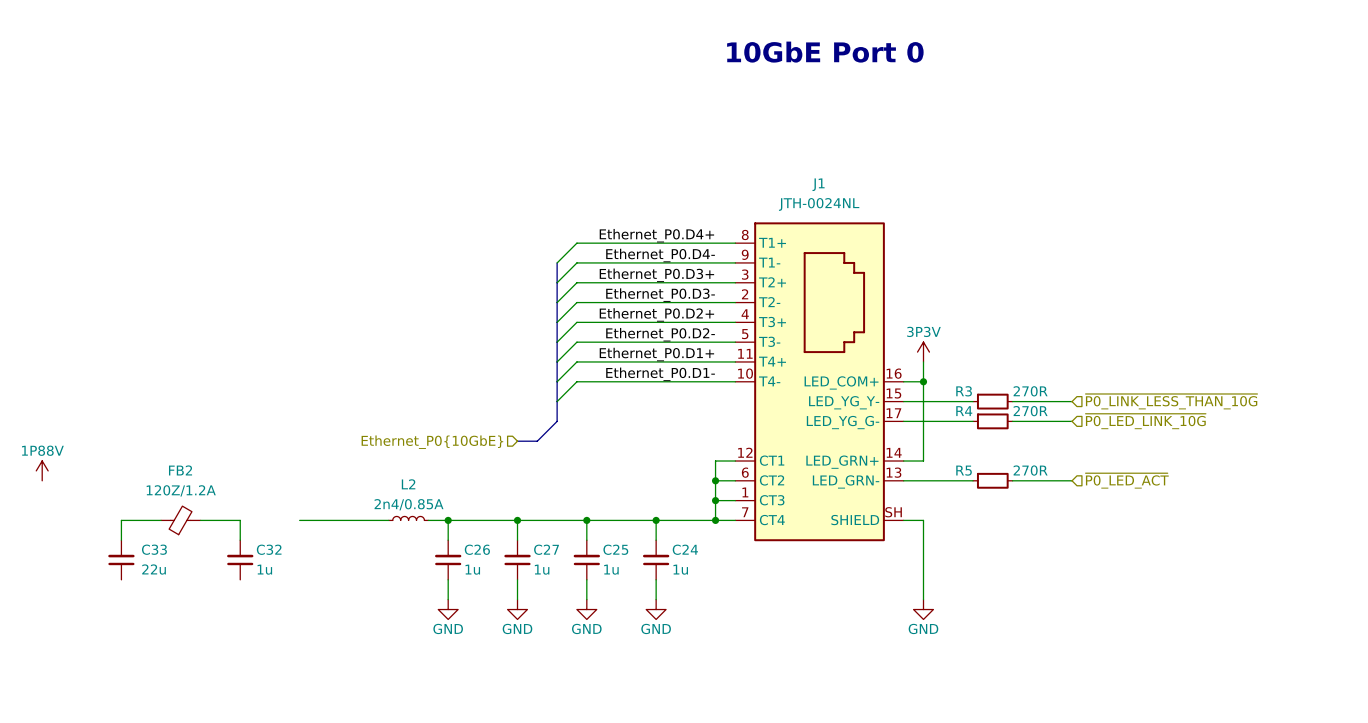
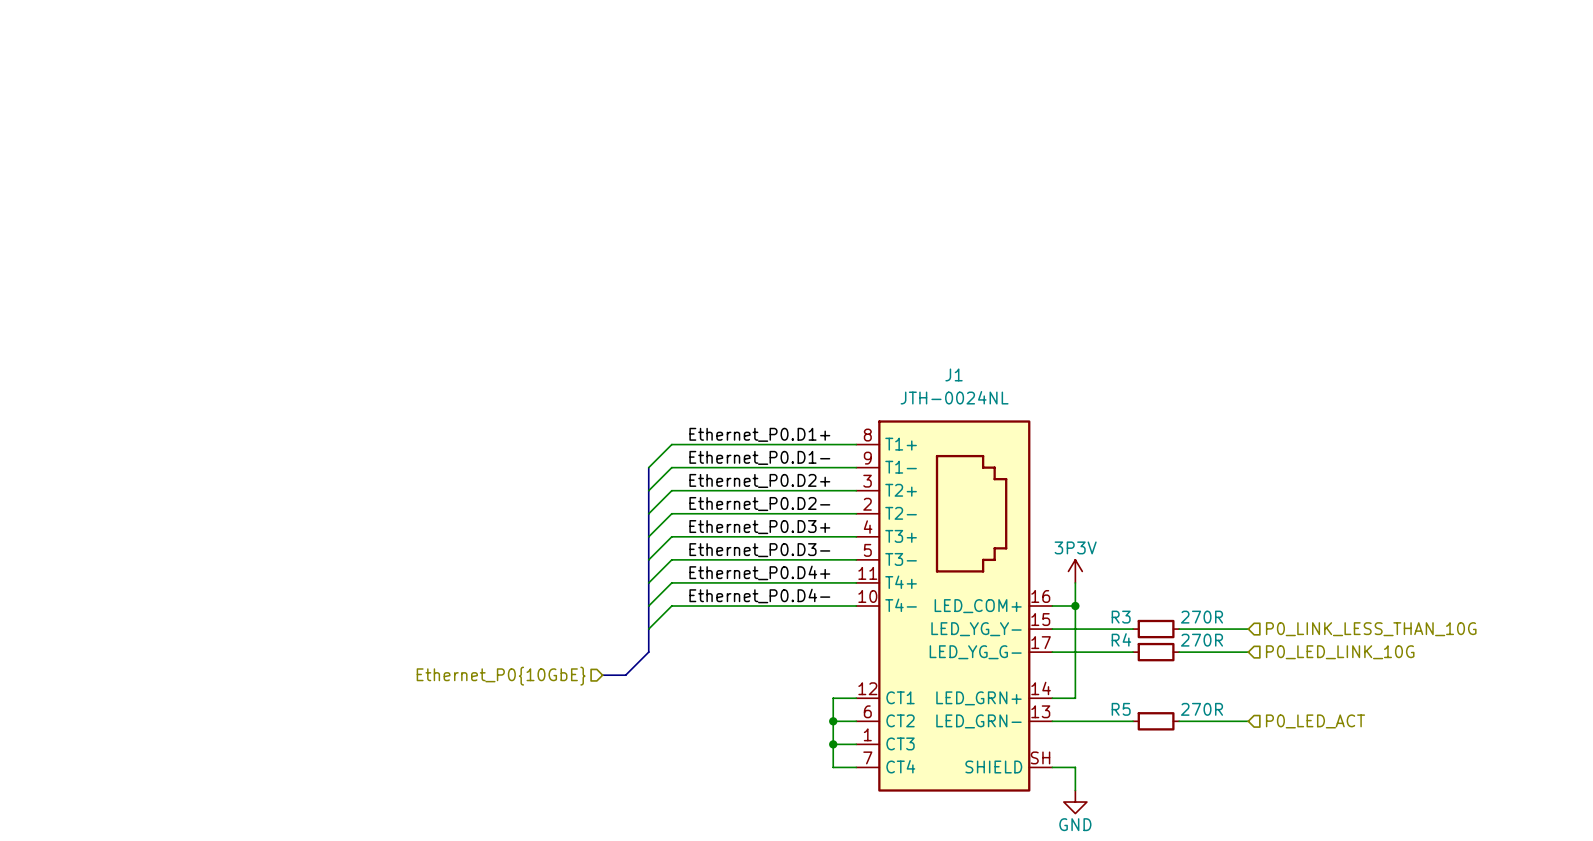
text: 10GbE Port 0 (825, 52) -> none
label: Ethernet_P0.D4+ (656, 235) -> none
wire: (735, 243) (576, 243) (557, 262) -> none
label: Ethernet_P0.D4- (660, 255) -> none
bus: (557, 262) (557, 401) -> none
wire: (735, 262) (576, 262) (557, 282) -> (856, 467) (671, 467) (648, 490)
label position: Ethernet_P0.D3+ (656, 275) -> Ethernet_P0.D3+ (759, 527)
wire: (735, 282) (576, 282) (557, 302) -> (856, 490) (671, 490) (648, 513)
label position: Ethernet_P0.D3- (660, 295) -> Ethernet_P0.D3- (759, 550)
wire: (735, 302) (576, 302) (557, 322) -> (856, 513) (671, 513) (648, 536)
label position: Ethernet_P0.D2+ (656, 314) -> Ethernet_P0.D2+ (759, 480)
wire: (735, 322) (576, 322) (557, 342) -> none
label position: Ethernet_P0.D2- (660, 334) -> Ethernet_P0.D2- (759, 504)
wire: (735, 342) (576, 342) (557, 361) -> none
power symbol position: 3P3V (923, 352) -> 3P3V (1075, 571)
label: Ethernet_P0.D1+ (656, 354) -> none
wire: (735, 361) (576, 361) (557, 381) -> none
wire: (923, 361) (923, 461) (903, 461) -> none
label: Ethernet_P0.D1- (660, 374) -> Ethernet_P0.D1+ (759, 434)
J1 position: (819, 381) -> (954, 606)
wire: (903, 381) (923, 381) -> none
junction: (923, 381) -> none
label: none -> Ethernet_P0.D1- (759, 457)
wire: (903, 401) (973, 401) -> (1052, 629) (1133, 629)
R3 position: (992, 401) -> (1156, 629)
wire: (1012, 401) (1072, 401) -> (1179, 629) (1248, 629)
hierarchical label: ~{P0_LINK_LESS_THAN_10G} (1171, 401) -> none
bus: (557, 421) (537, 441) (517, 441) -> (648, 490) (648, 652) (625, 675) (602, 675)
wire: (903, 421) (973, 421) -> (1052, 652) (1133, 652)
R4 position: (992, 421) -> (1156, 652)
wire: (1012, 421) (1072, 421) -> (1179, 652) (1248, 652)
hierarchical label: ~{P0_LED_LINK_10G} (1145, 421) -> none
hierarchical label position: Ethernet_P0{10GbE} (432, 442) -> Ethernet_P0{10GbE} (501, 676)
wire: (715, 461) (715, 520) -> (833, 536) (671, 536) (648, 559)
power symbol: 1P88V (42, 470) -> none
wire: none -> (833, 559) (671, 559) (648, 582)
junction: (715, 480) -> none
wire: (903, 480) (973, 480) -> (1052, 721) (1133, 721)
R5 position: (992, 480) -> (1156, 721)
wire: (1012, 480) (1072, 480) -> (1179, 721) (1248, 721)
hierarchical label: ~{P0_LED_ACT} (1127, 480) -> none
label: none -> Ethernet_P0.D4+ (759, 572)
wire: none -> (833, 582) (671, 582) (648, 606)
junction: (715, 500) -> none
wire: none -> (1075, 582) (1075, 606)
label: none -> Ethernet_P0.D4- (759, 595)
L2: (408, 518) -> none
wire: (161, 520) (121, 520) (121, 540) -> none
FB2: (180, 520) -> none
wire: (200, 520) (240, 520) (240, 540) -> none
wire: (299, 520) (388, 520) -> none
wire: (428, 520) (576, 520) -> (648, 629) (671, 606)
wire: (448, 520) (448, 540) -> none
junction: (448, 520) -> none
wire: (517, 520) (517, 540) -> none
junction: (517, 520) -> none
wire: (586, 520) (586, 540) -> none
junction: (586, 520) -> none
wire: (656, 520) (656, 540) -> none
junction: (656, 520) -> none
junction: (715, 520) -> none
junction: none -> (1075, 606)
hierarchical label: none -> P0_LINK_LESS_THAN_10G (1371, 629)
C33: (121, 560) -> none
C32: (240, 560) -> none
C26: (448, 560) -> none
C27: (517, 560) -> none
C25: (586, 560) -> none
C24: (656, 560) -> none
hierarchical label: none -> P0_LED_LINK_10G (1340, 652)
wire: (448, 579) (448, 599) -> none
wire: (517, 579) (517, 599) -> none
wire: (586, 579) (586, 599) -> none
wire: (656, 579) (656, 599) -> none
wire: none -> (856, 698) (833, 698) (833, 767) (856, 767)
wire: none -> (1052, 698) (1075, 698)
power symbol: GND (448, 609) -> none
power symbol: GND (517, 609) -> none
power symbol: GND (586, 609) -> none
power symbol: GND (656, 609) -> none
power symbol position: GND (923, 609) -> GND (1075, 802)
wire: none -> (833, 721) (856, 721)
junction: none -> (833, 721)
hierarchical label: none -> P0_LED_ACT (1315, 721)
wire: none -> (833, 744) (856, 744)
junction: none -> (833, 744)
wire: none -> (1052, 767) (1075, 767) (1075, 790)

